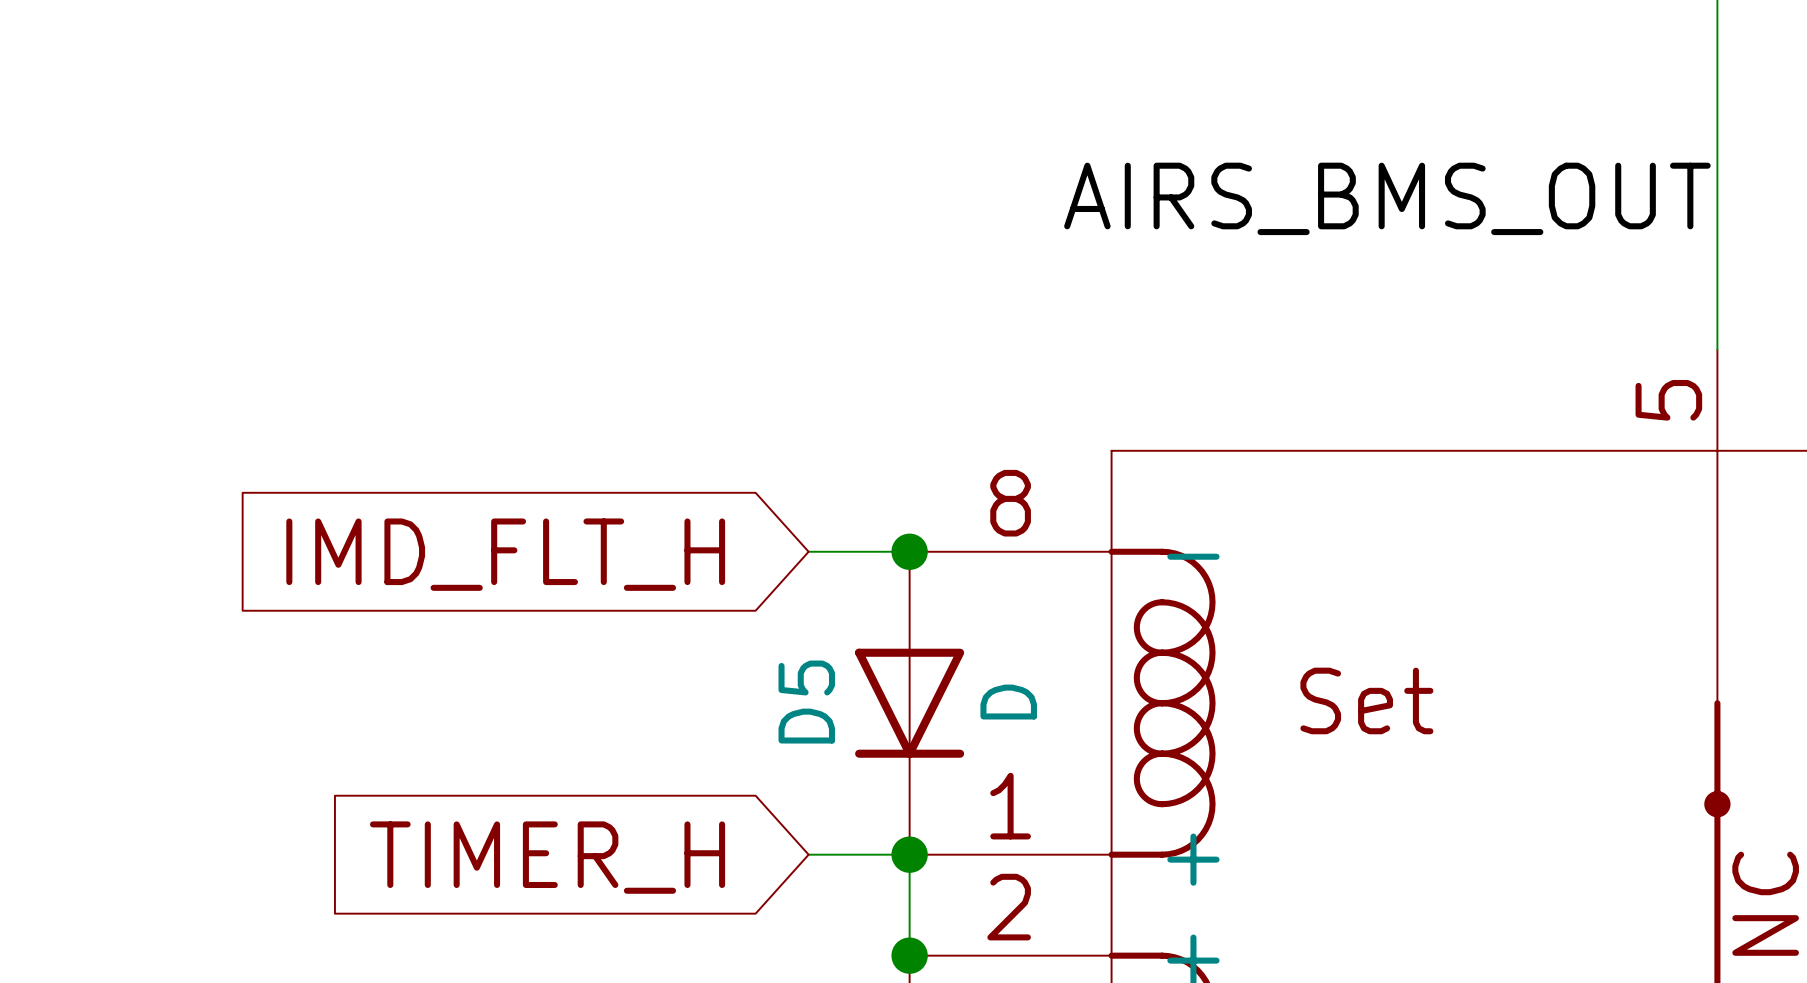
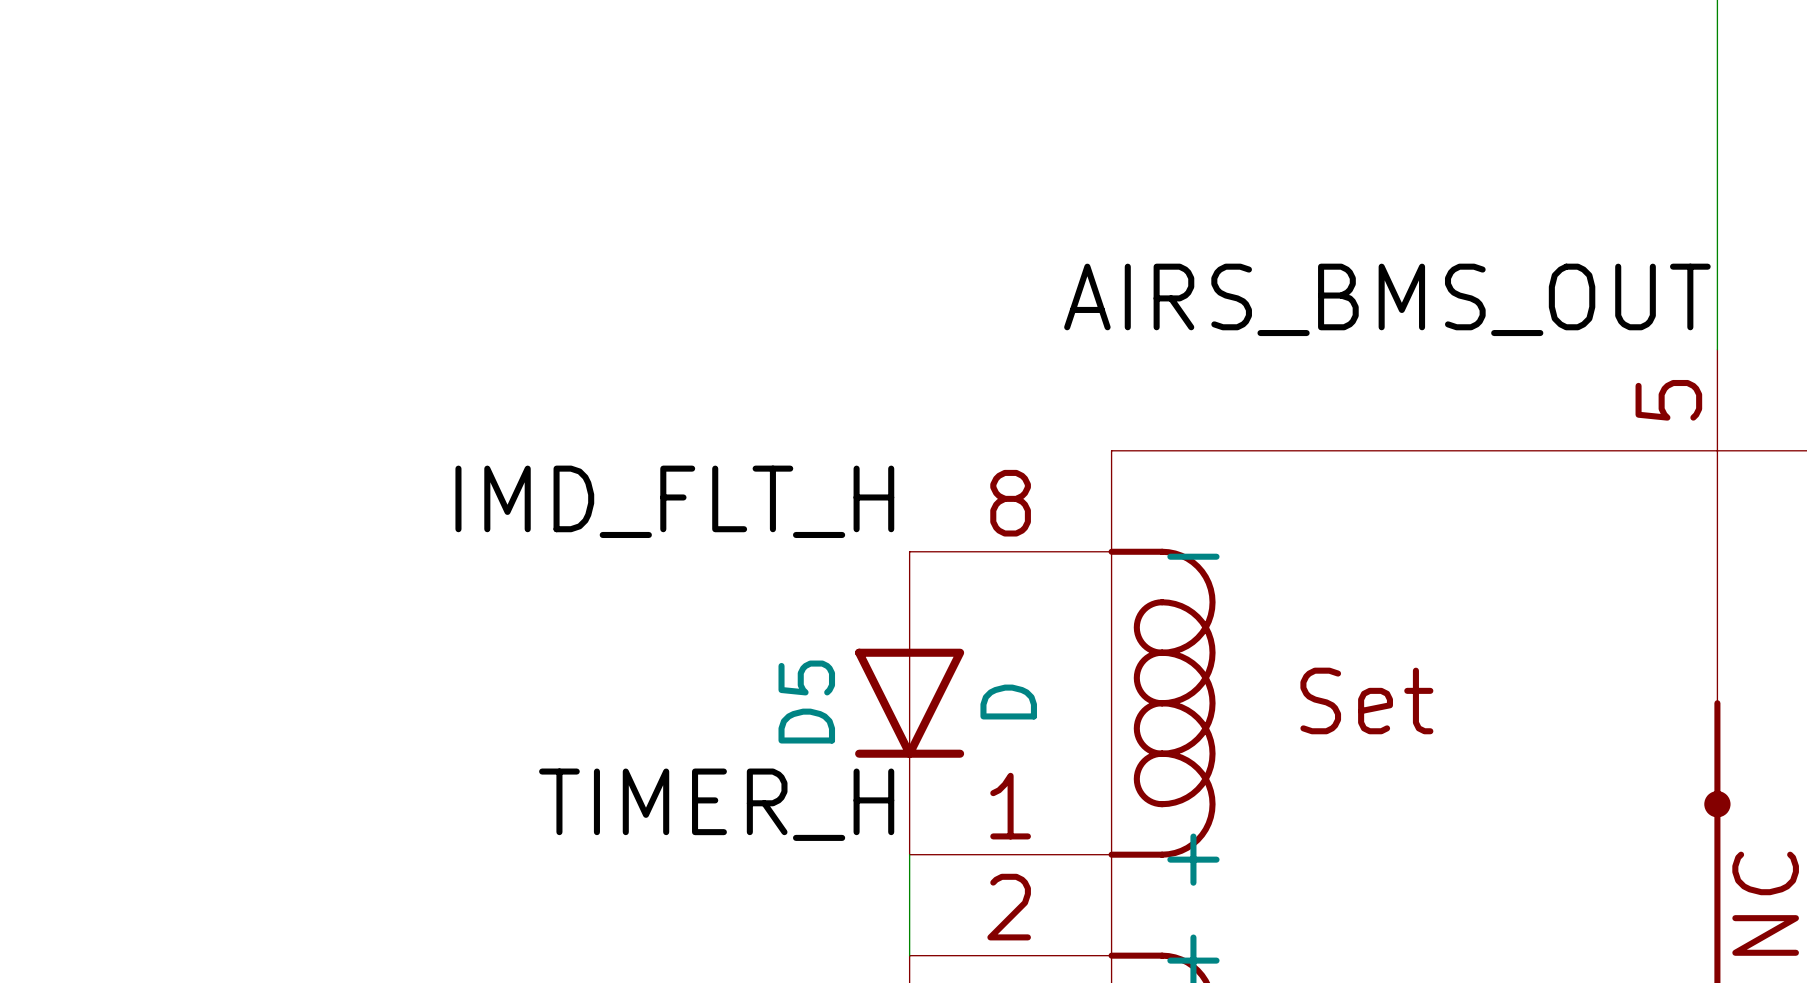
label position: AIRS_BMS_OUT (1387, 198) -> AIRS_BMS_OUT (1387, 299)
label: none -> IMD_FLT_H (674, 501)
wire: (808, 551) (909, 551) -> none
junction: (909, 551) -> none
global label: IMD_FLT_H (505, 554) -> none
label: none -> TIMER_H (716, 804)
wire: (808, 854) (909, 854) -> none
junction: (909, 854) -> none
global label: TIMER_H (547, 857) -> none
junction: (909, 955) -> none

